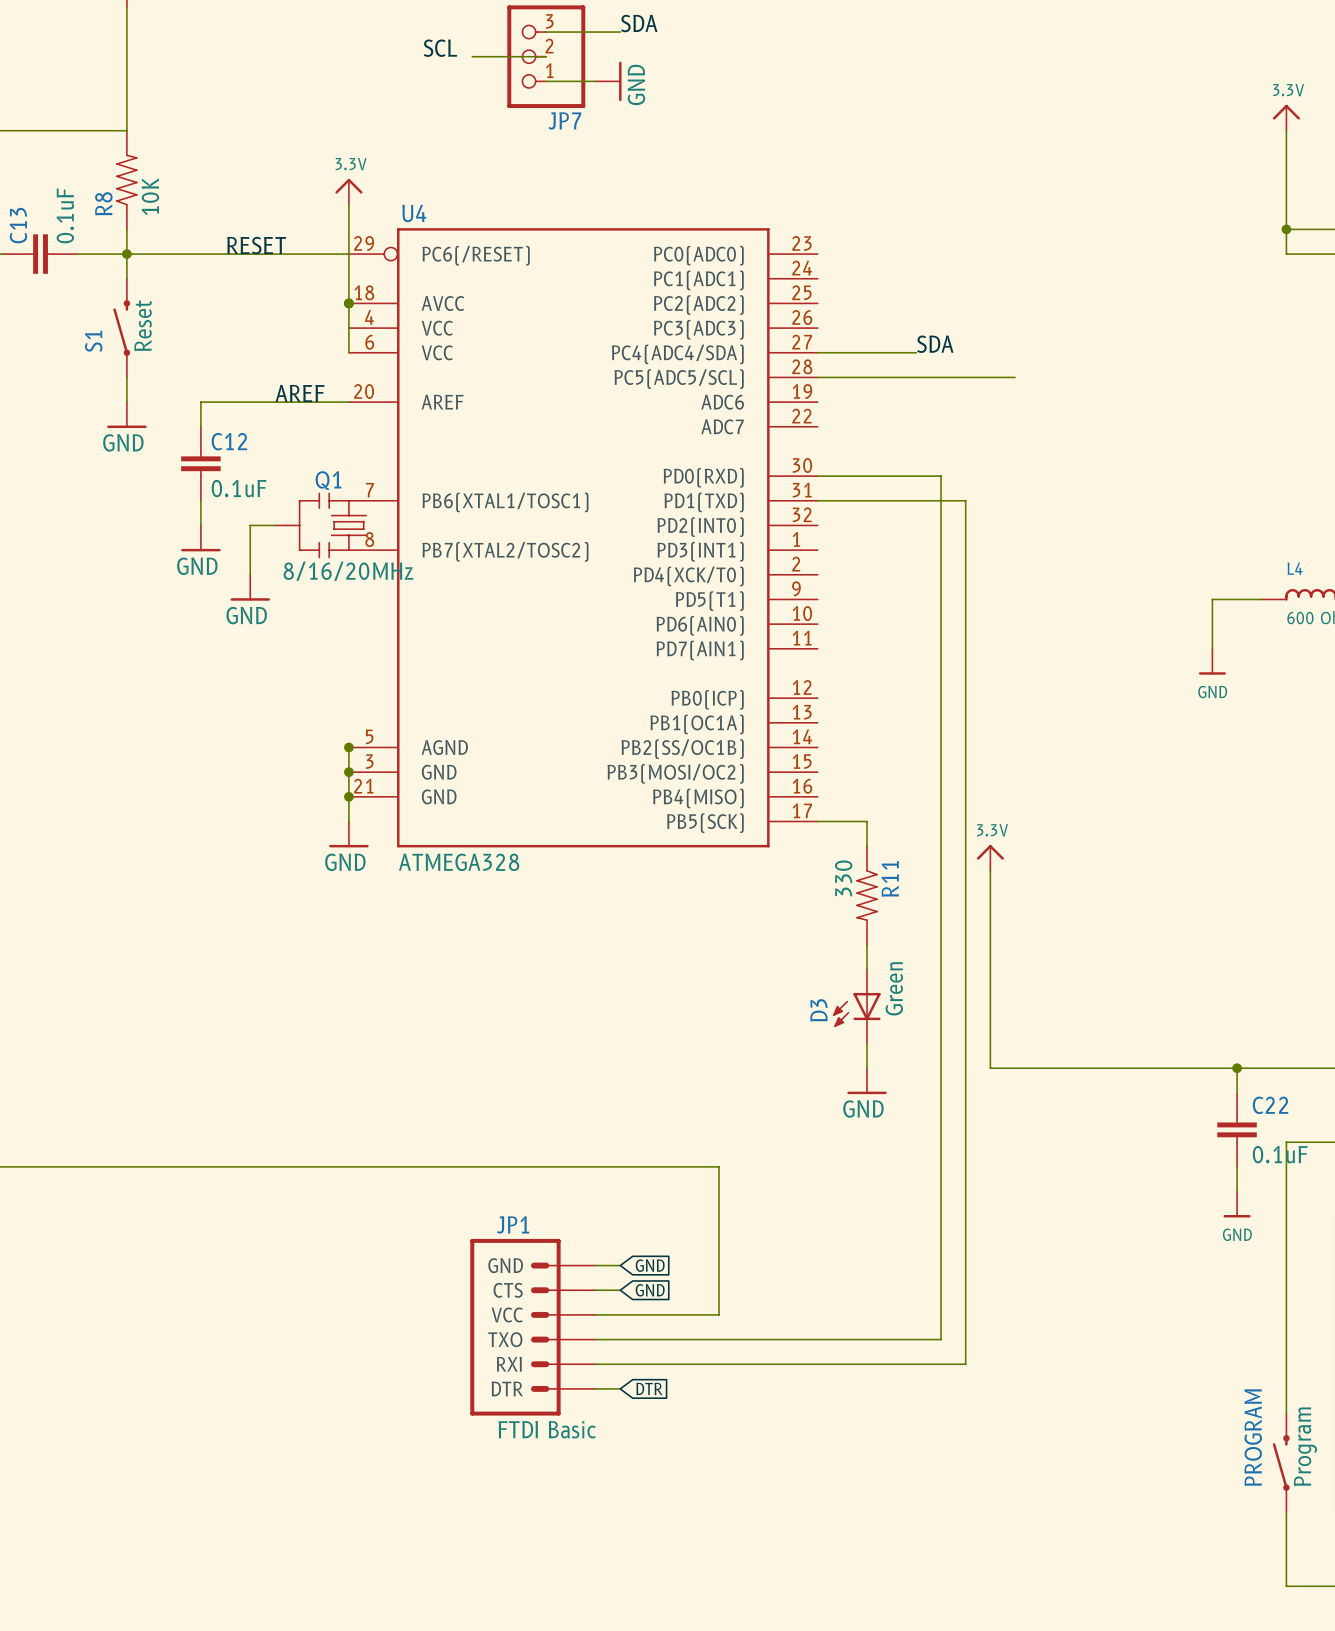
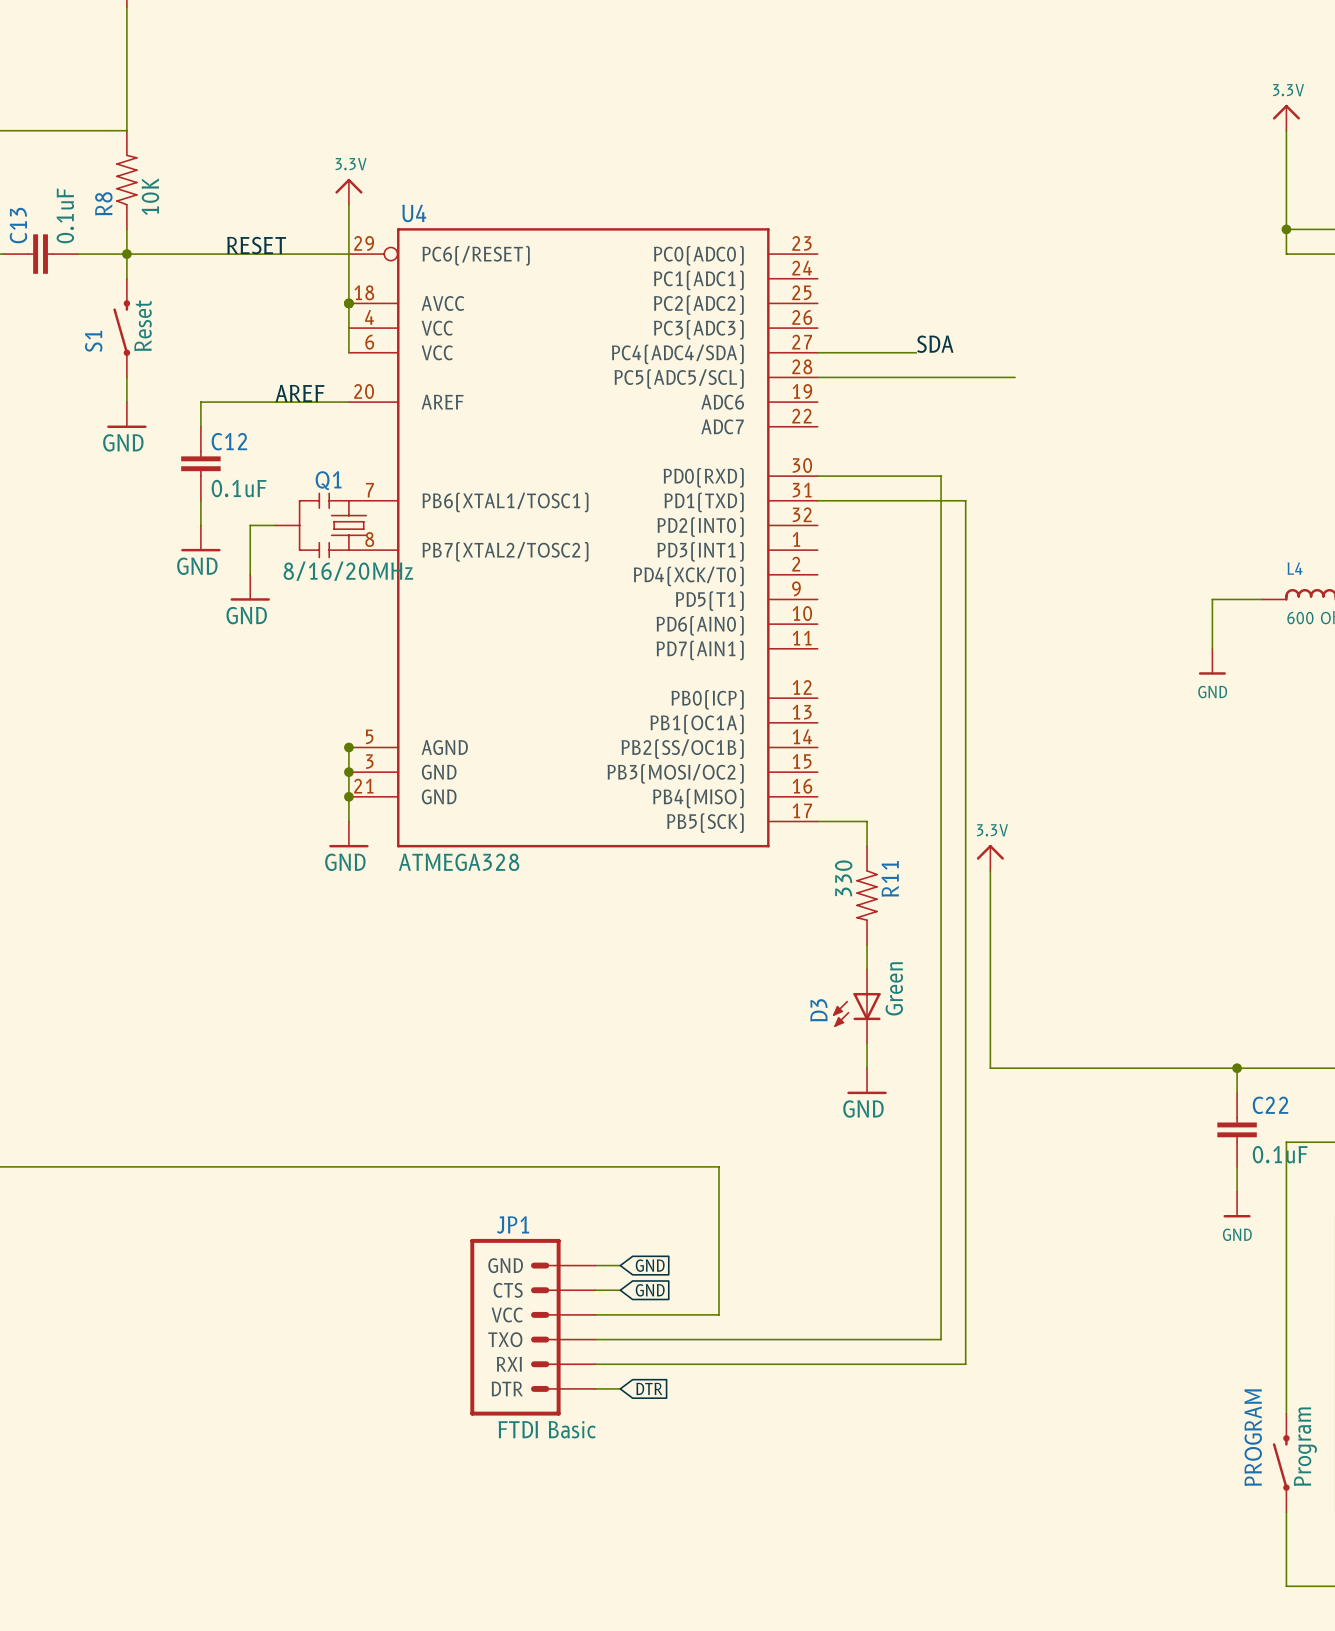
label: SDA (639, 23) -> none
wire: (546, 32) (620, 32) -> none
label: SCL (440, 48) -> none
wire: (472, 56) (546, 56) -> none
JP7: (546, 56) -> none
wire: (546, 81) (595, 81) -> none
power symbol: GND (608, 81) -> none

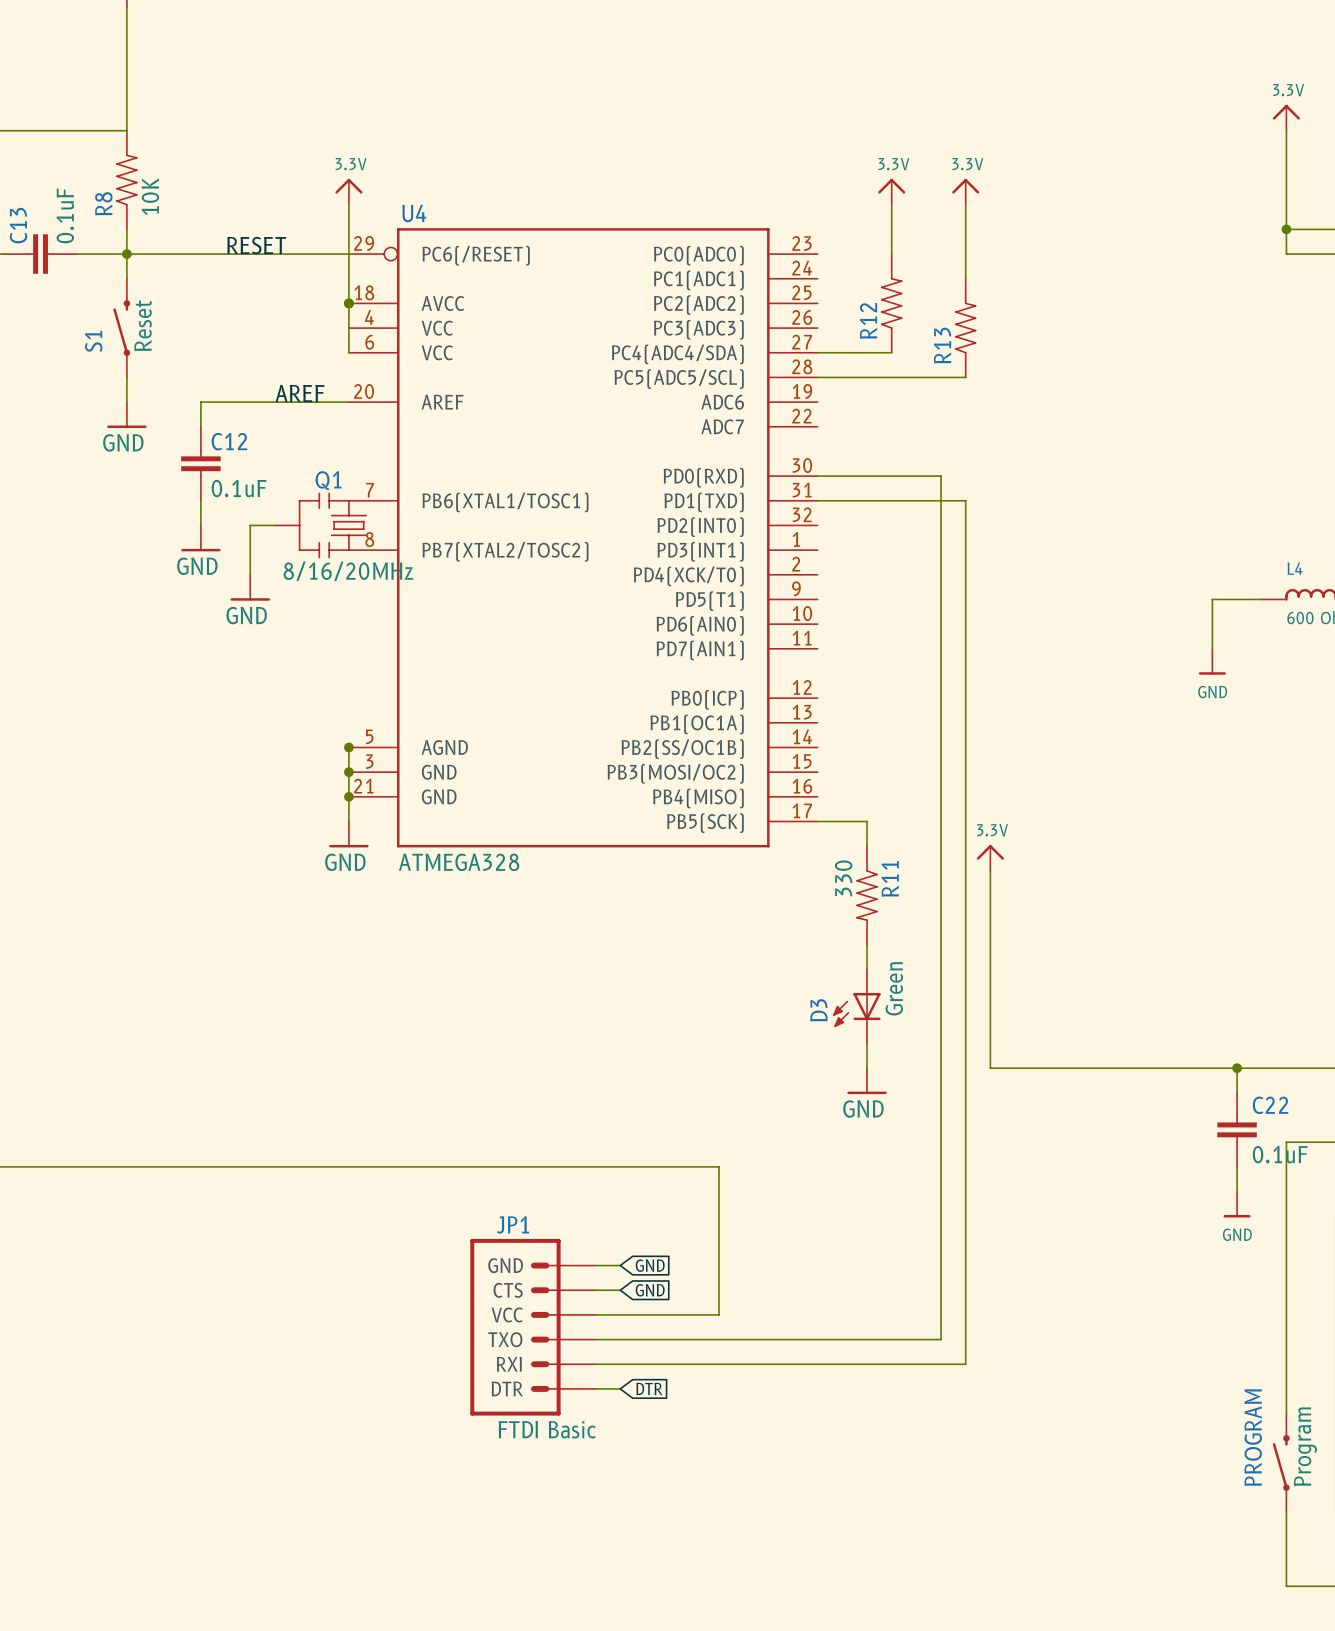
power symbol: none -> 3.3V (891, 191)
power symbol: none -> 3.3V (965, 191)
wire: none -> (891, 204) (891, 254)
wire: none -> (965, 204) (965, 278)
R12: none -> (891, 303)
R13: none -> (965, 328)
label: SDA (935, 344) -> none
wire: (891, 352) (916, 352) -> none
wire: (965, 377) (1015, 377) -> none

